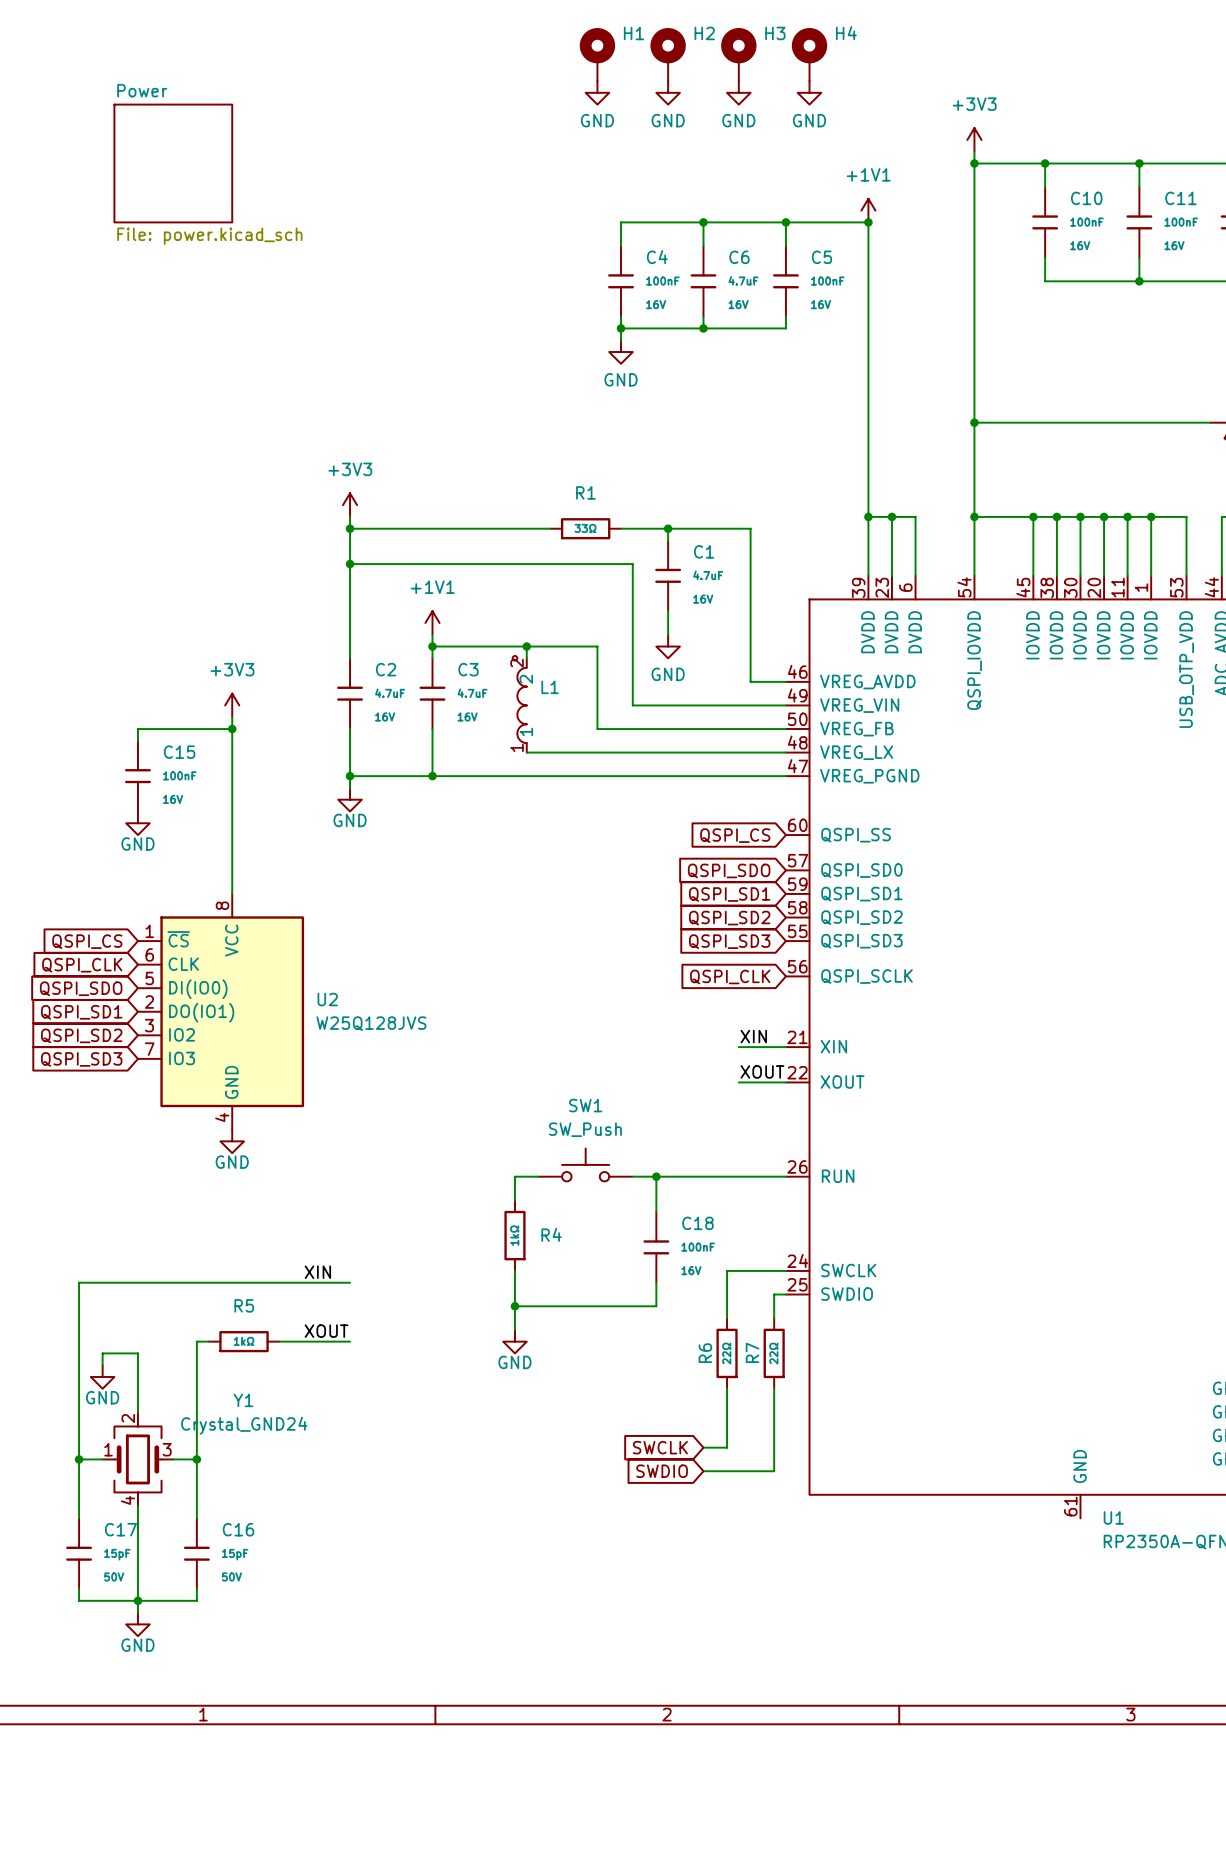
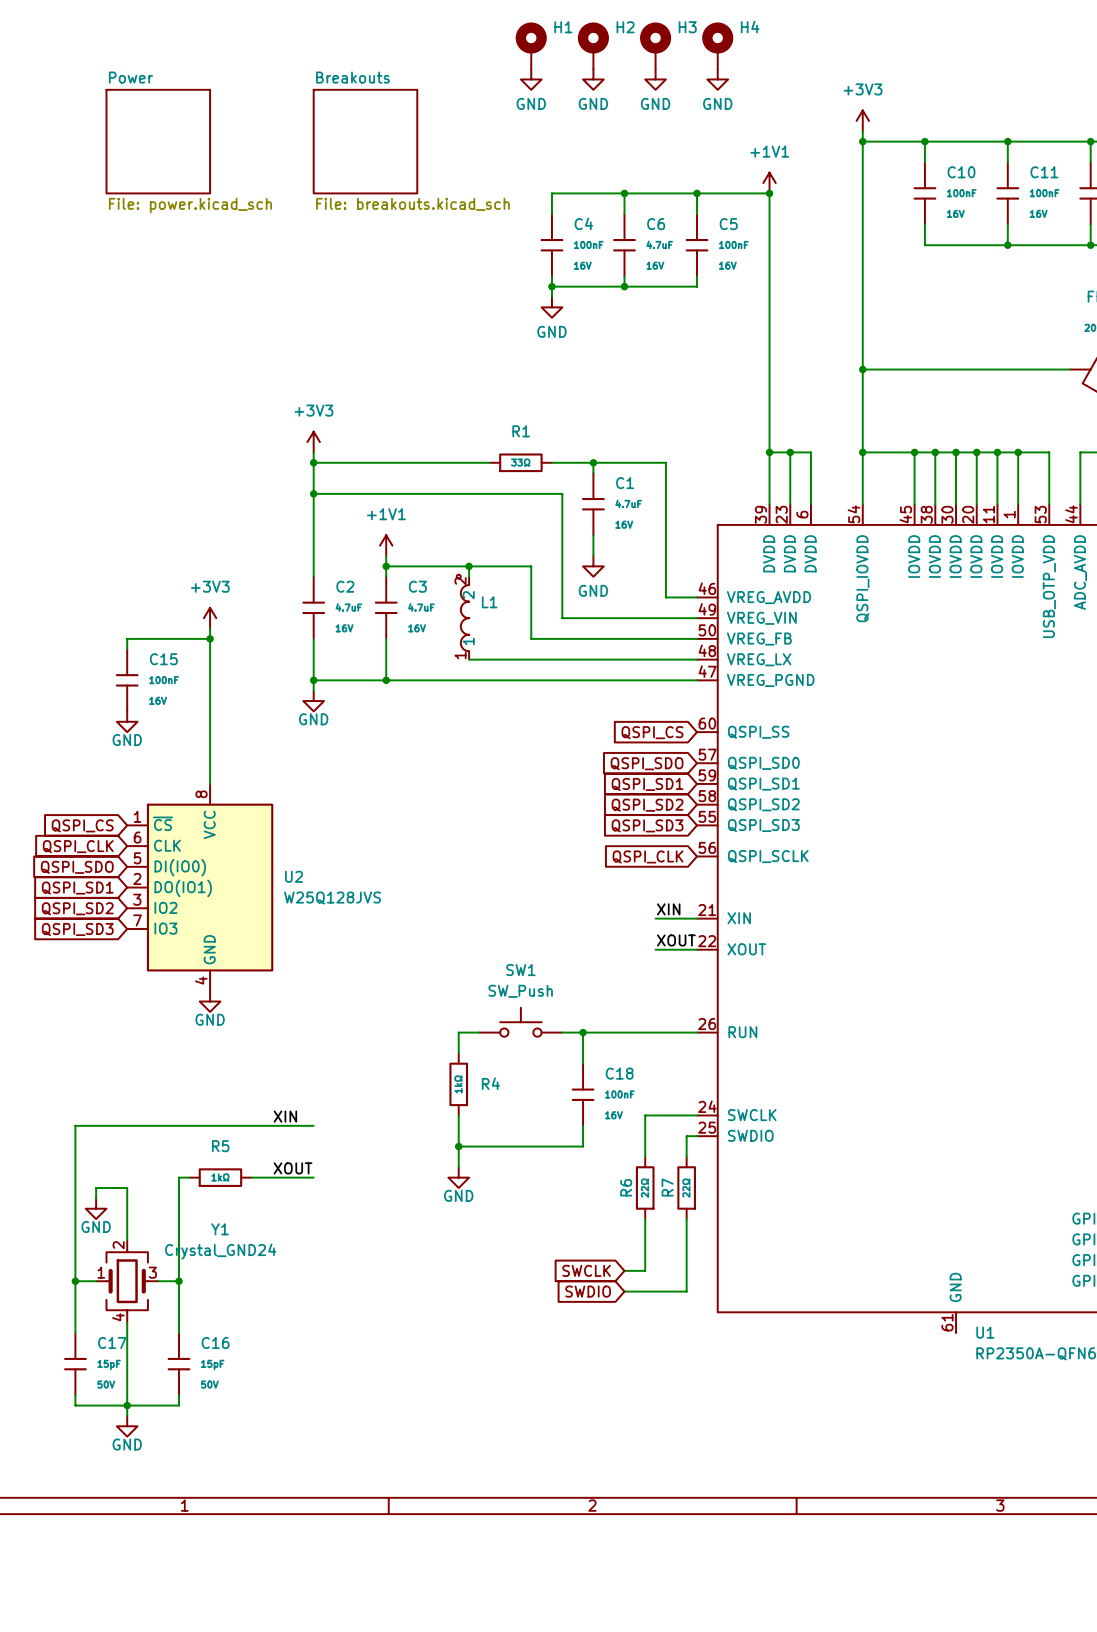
sheet Breakouts: none -> File: breakouts.kicad_sch (365, 141)

